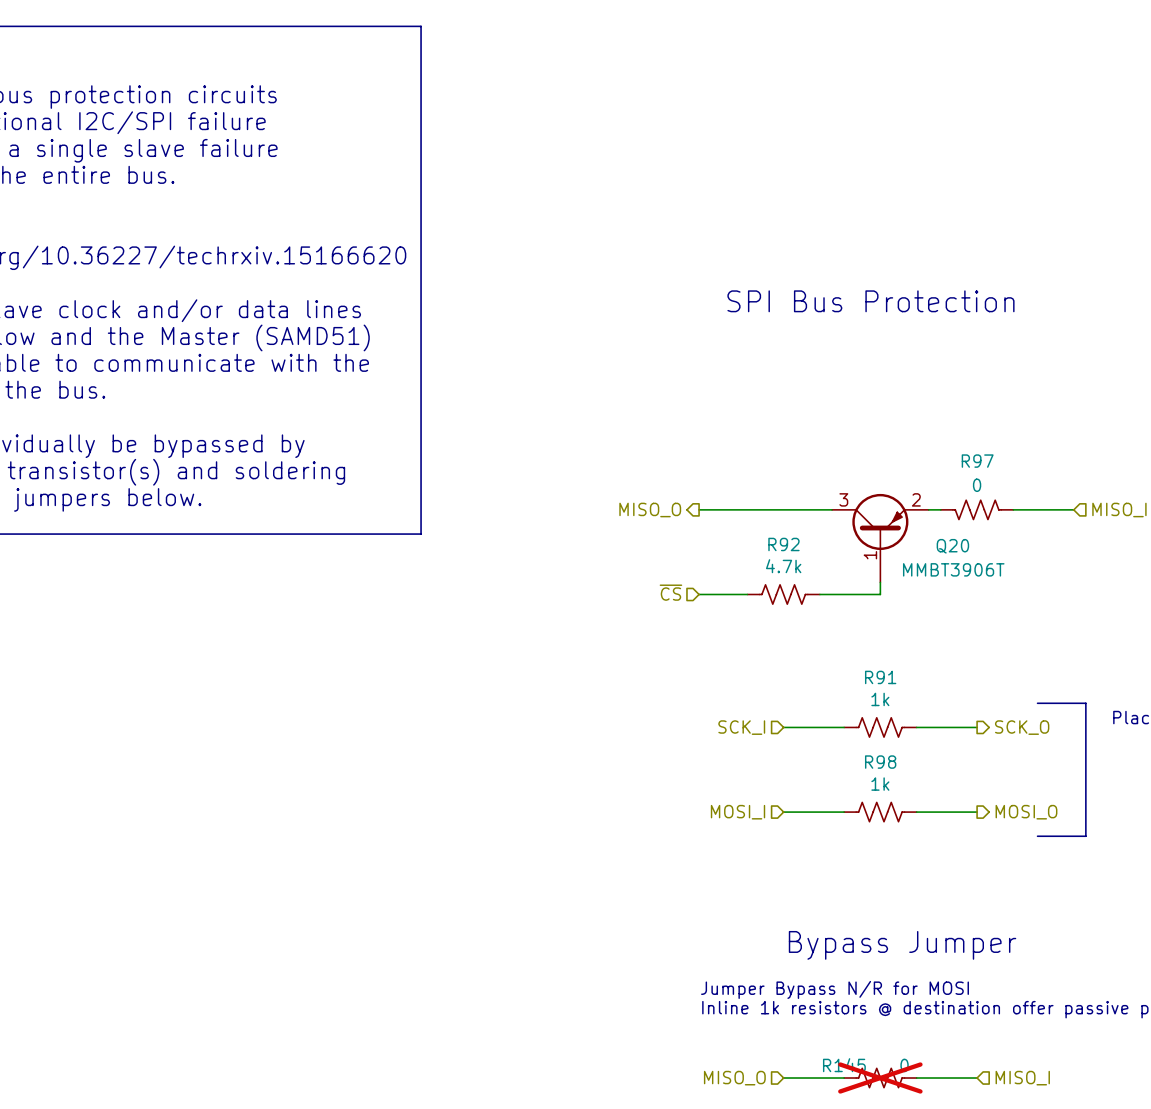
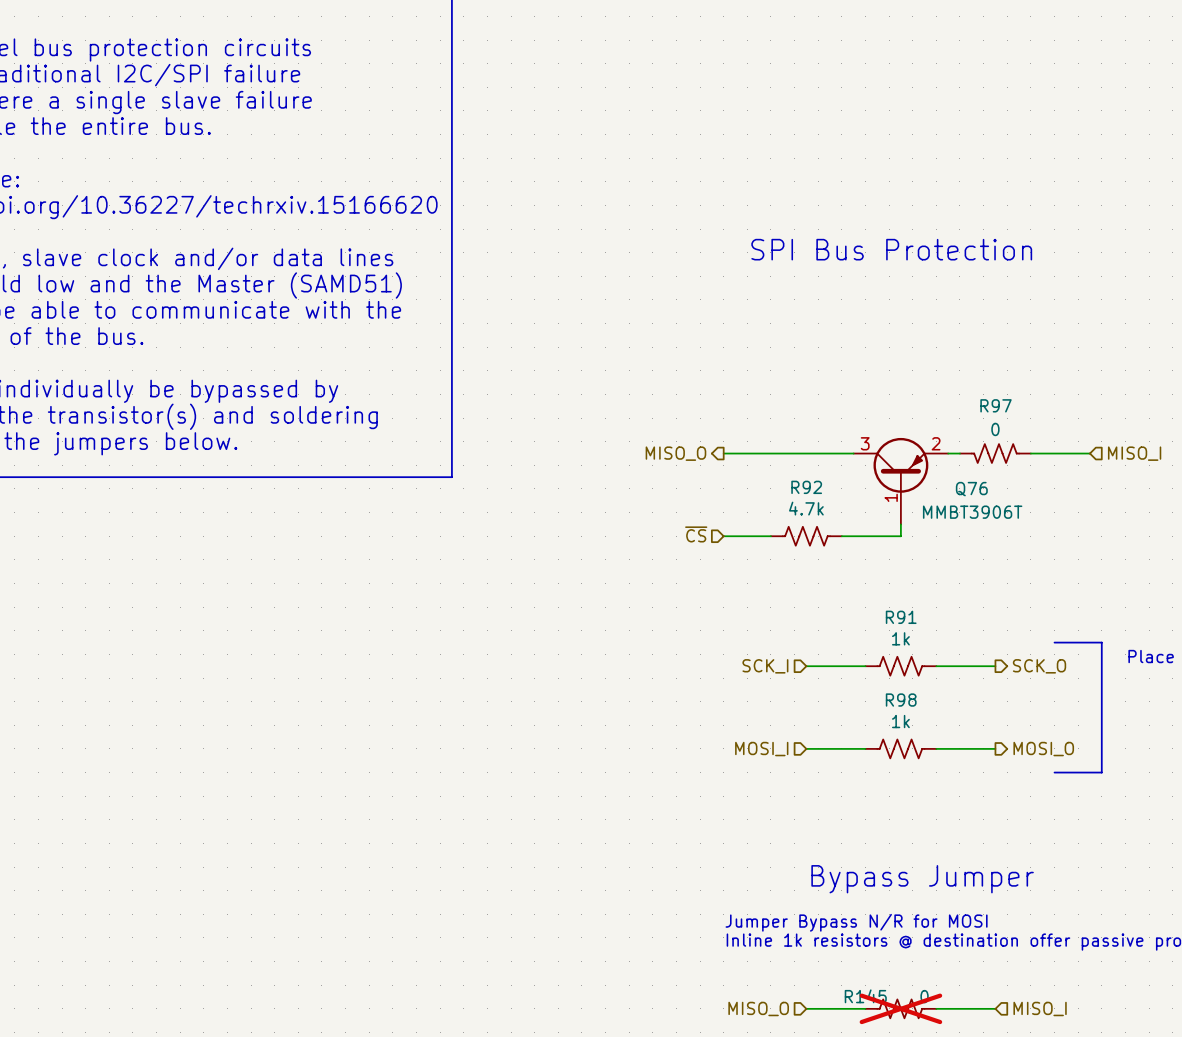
Q20 name: Q20 (952, 546) -> Q76 (971, 489)

